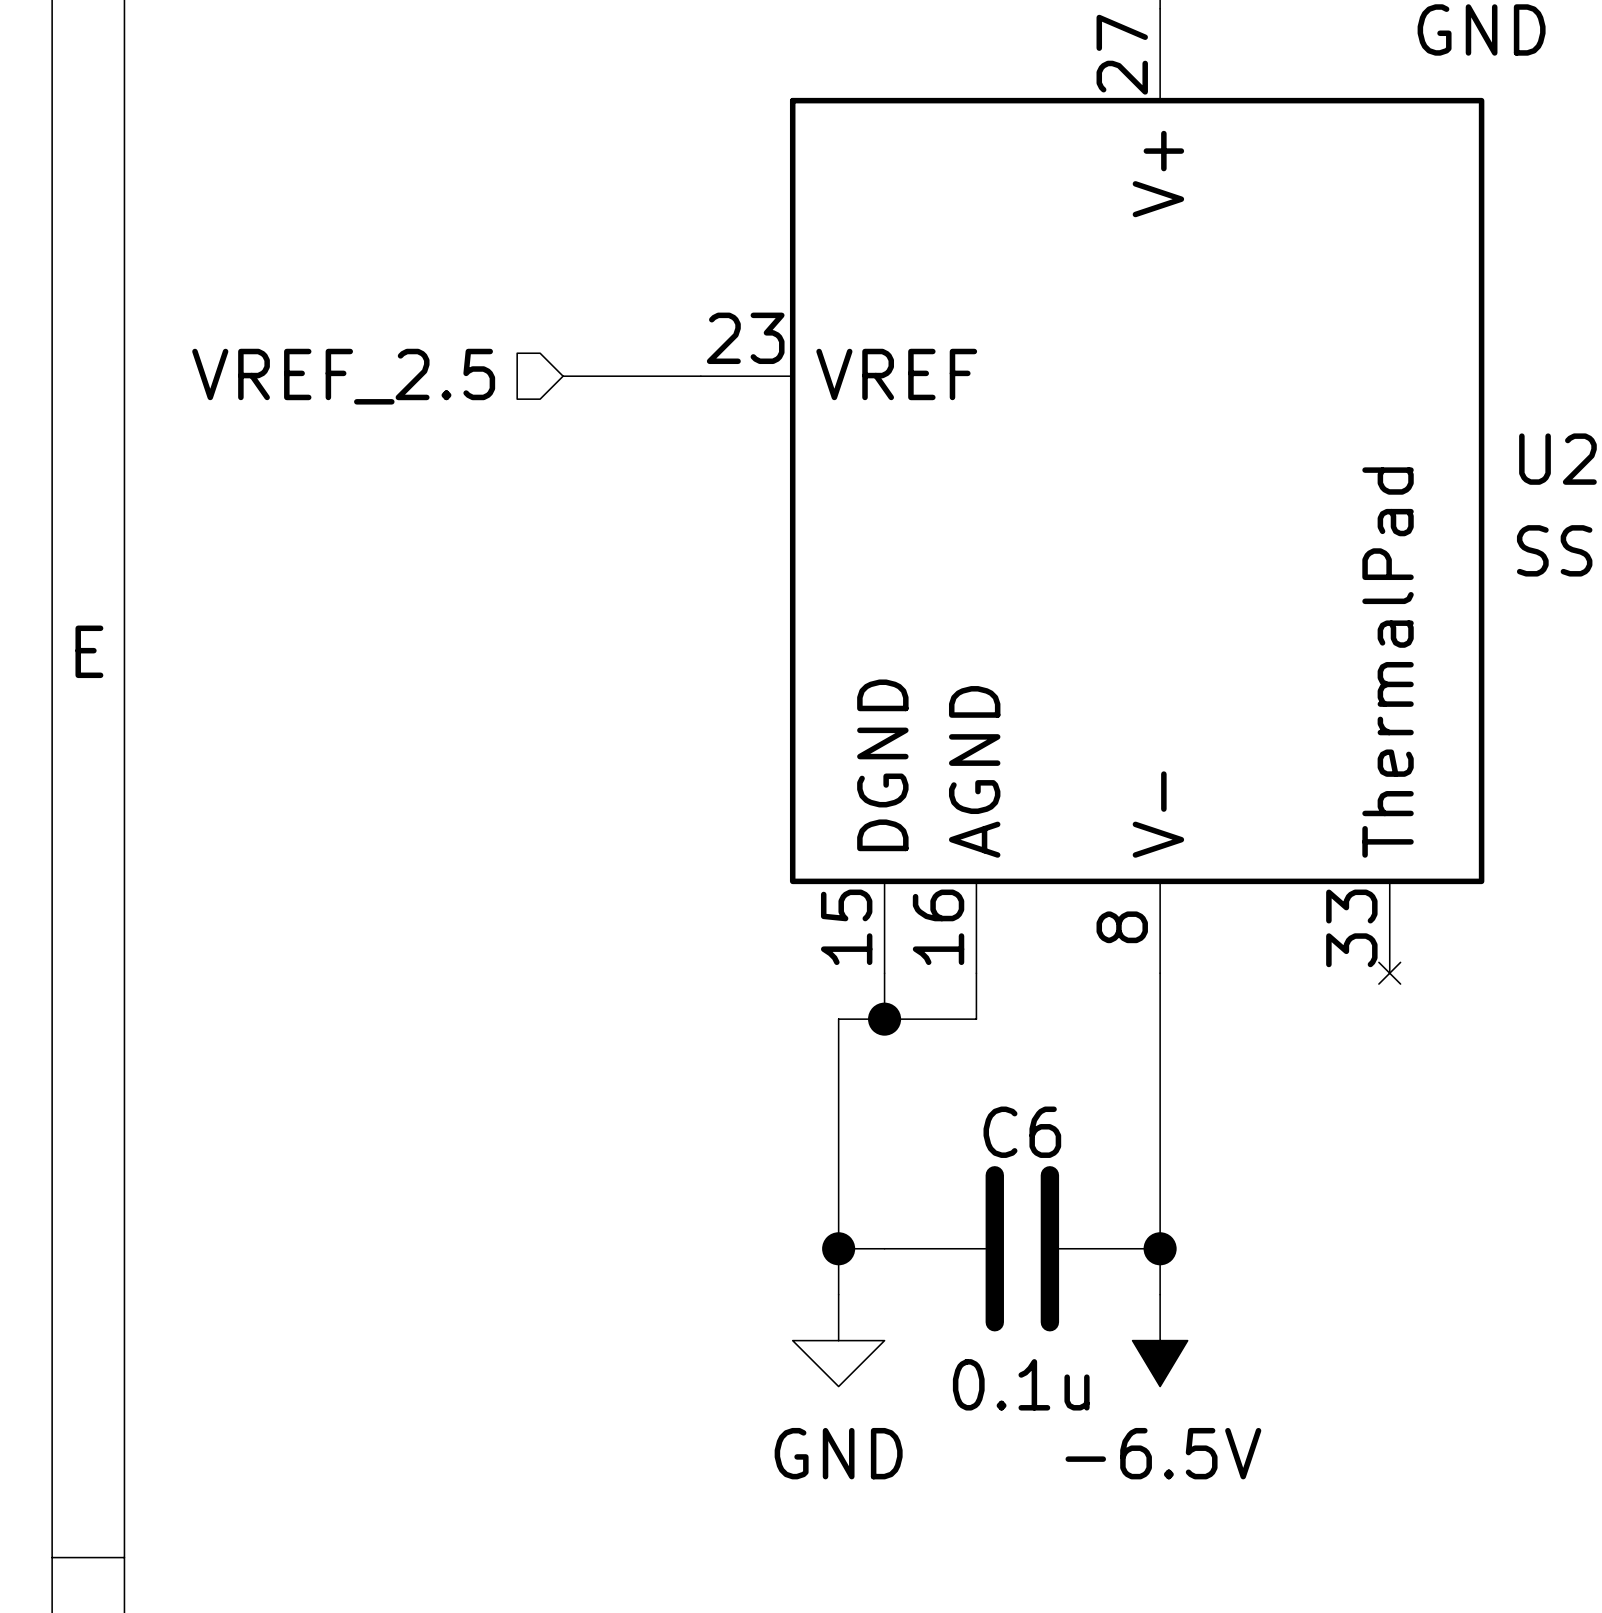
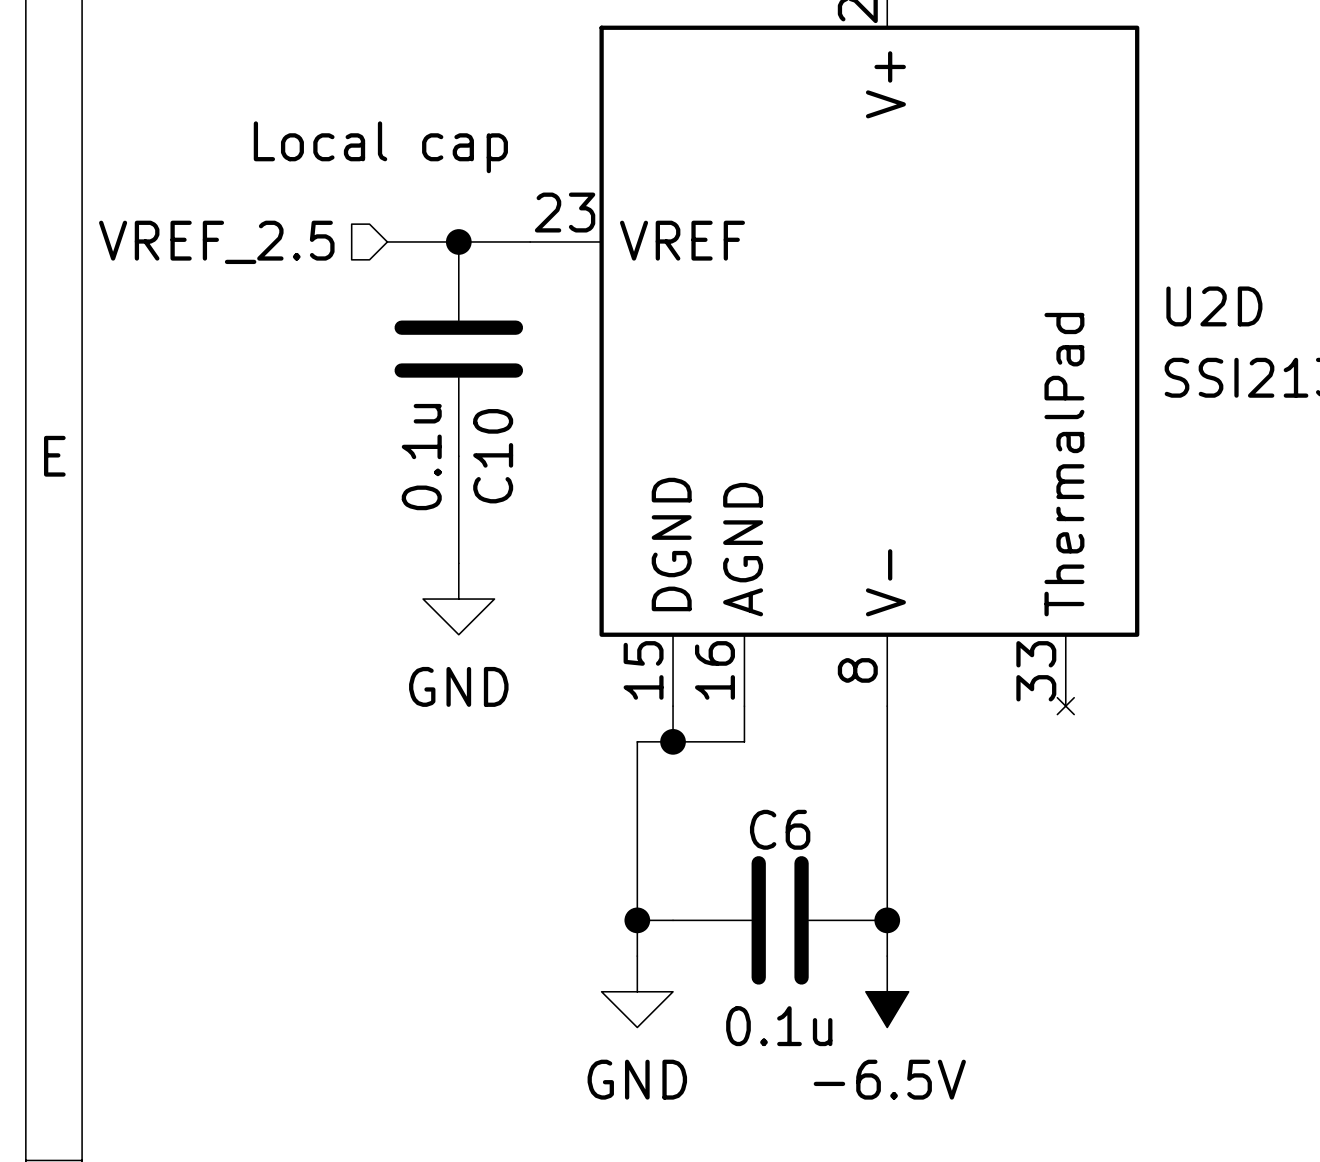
text: none -> Local cap (380, 147)
hierarchical label position: VREF_2.5 (343, 376) -> VREF_2.5 (216, 242)
wire: none -> (387, 241) (423, 241)
junction: none -> (458, 241)
C10: none -> 0.1u (458, 349)
wire: none -> (458, 456) (458, 563)
power symbol: none -> GND (458, 599)

